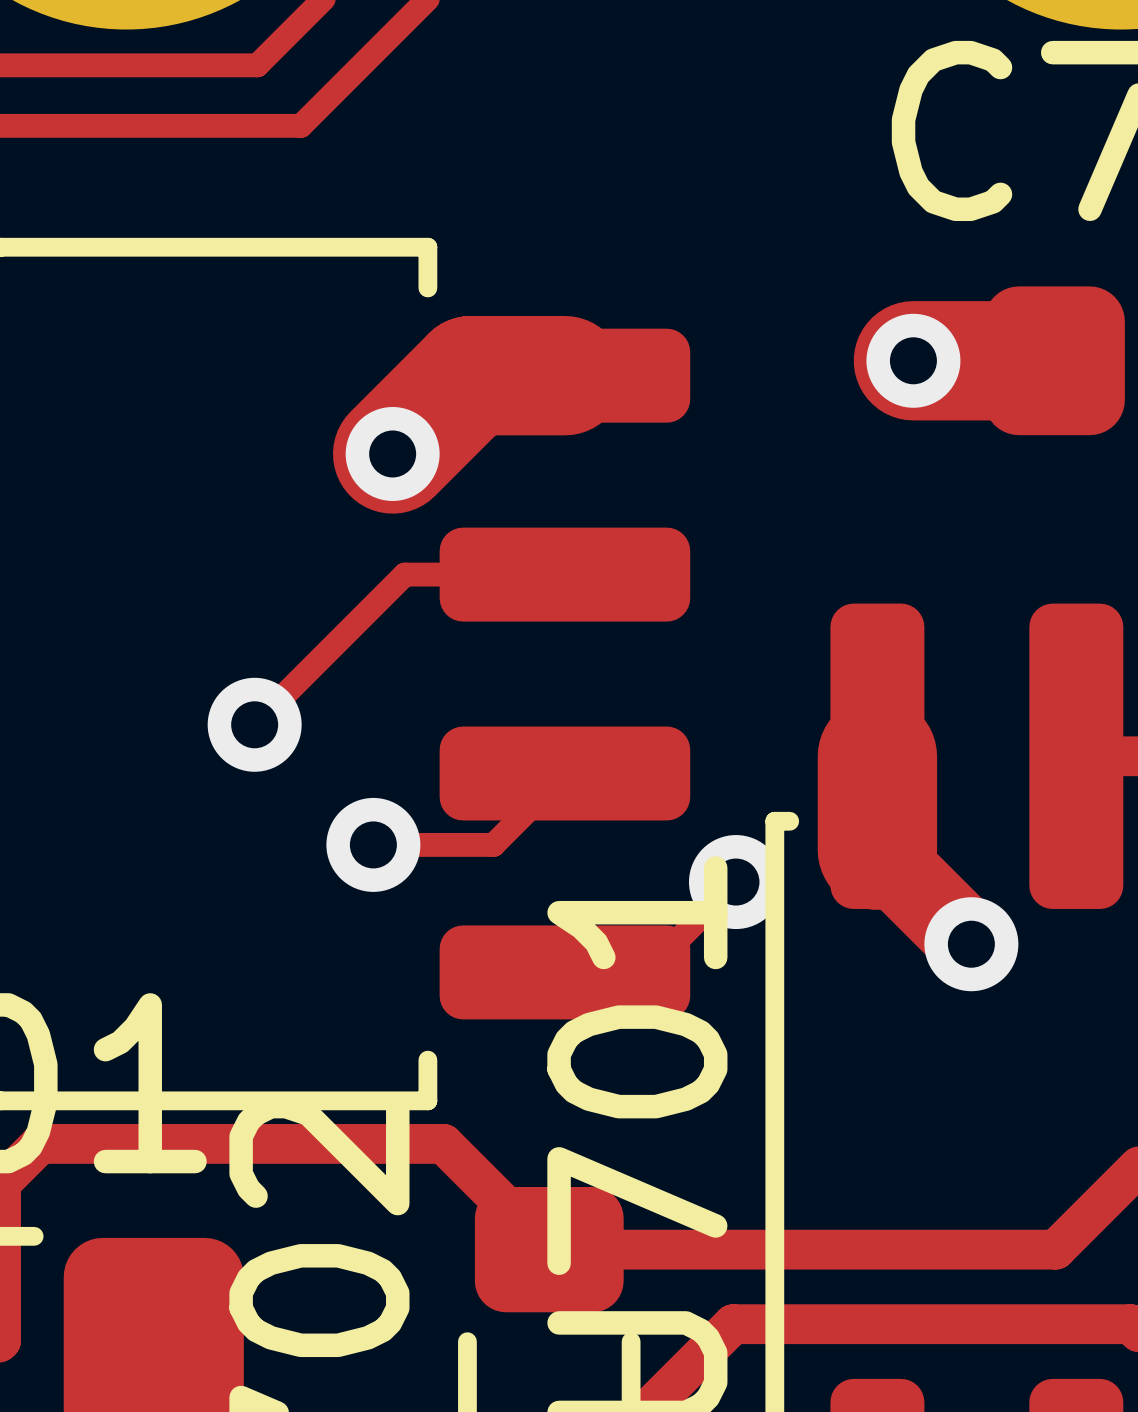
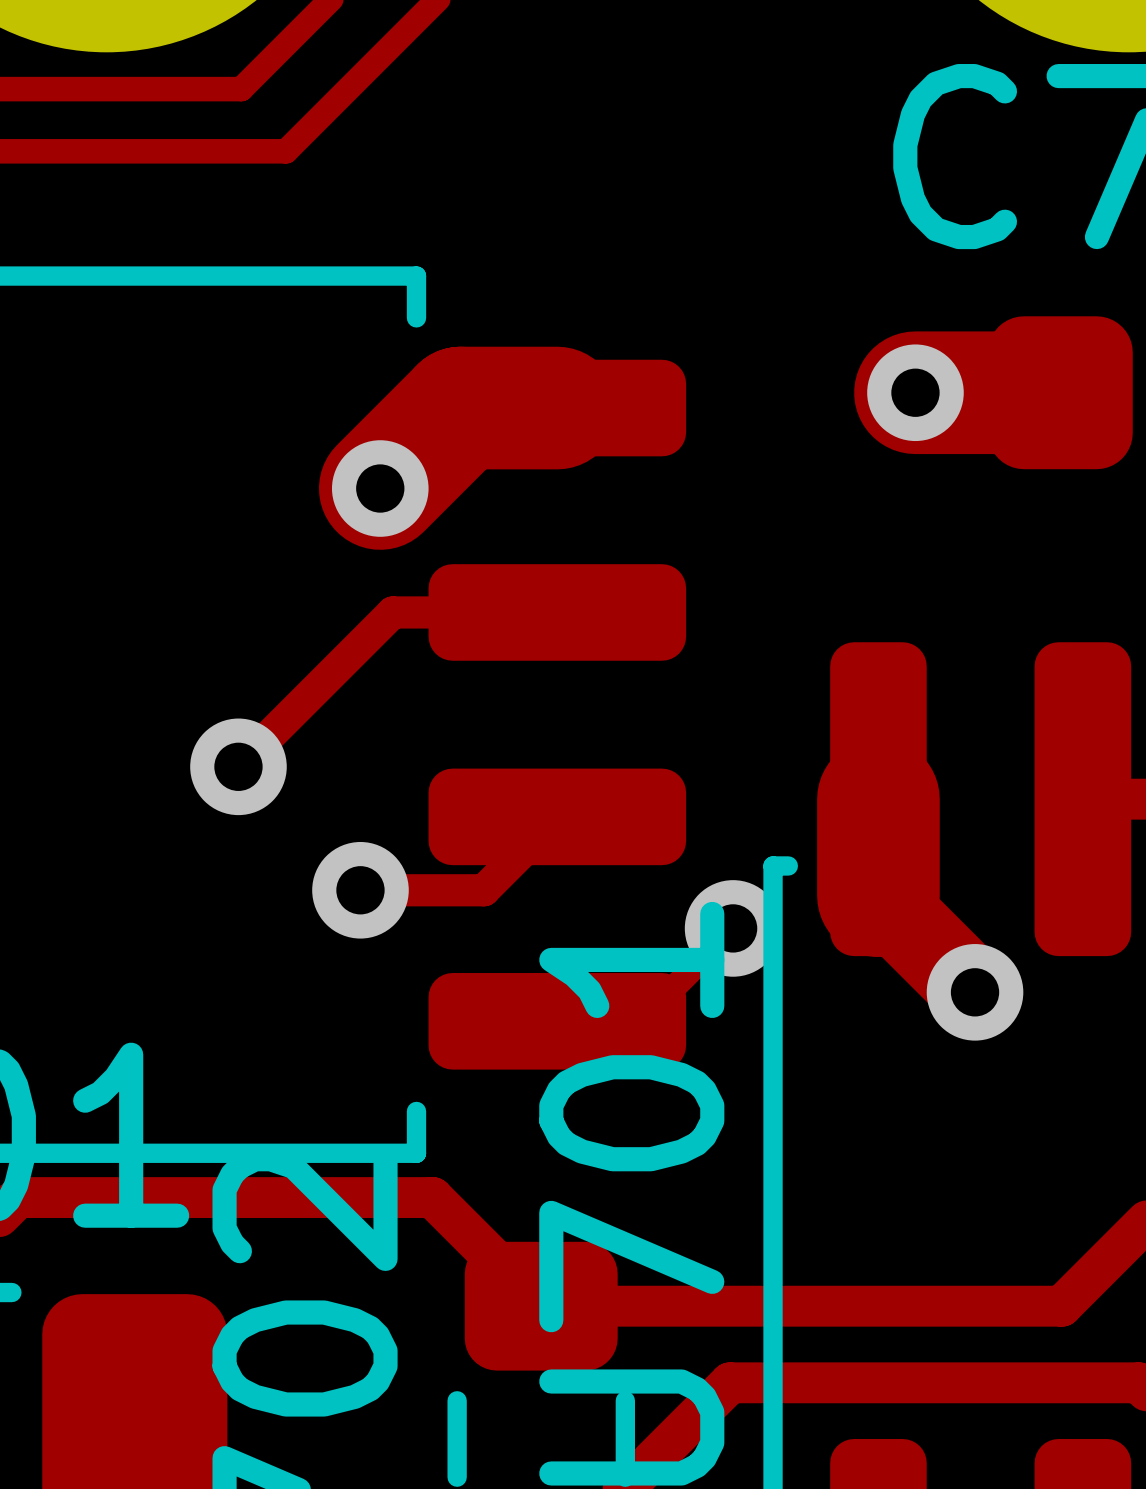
track width: thin (564, 574) (404, 574) (254, 724) -> thick (557, 612) (392, 612) (238, 766)
track width: thin (564, 773) (493, 844) (373, 844) -> thick (557, 816) (483, 890) (360, 890)

